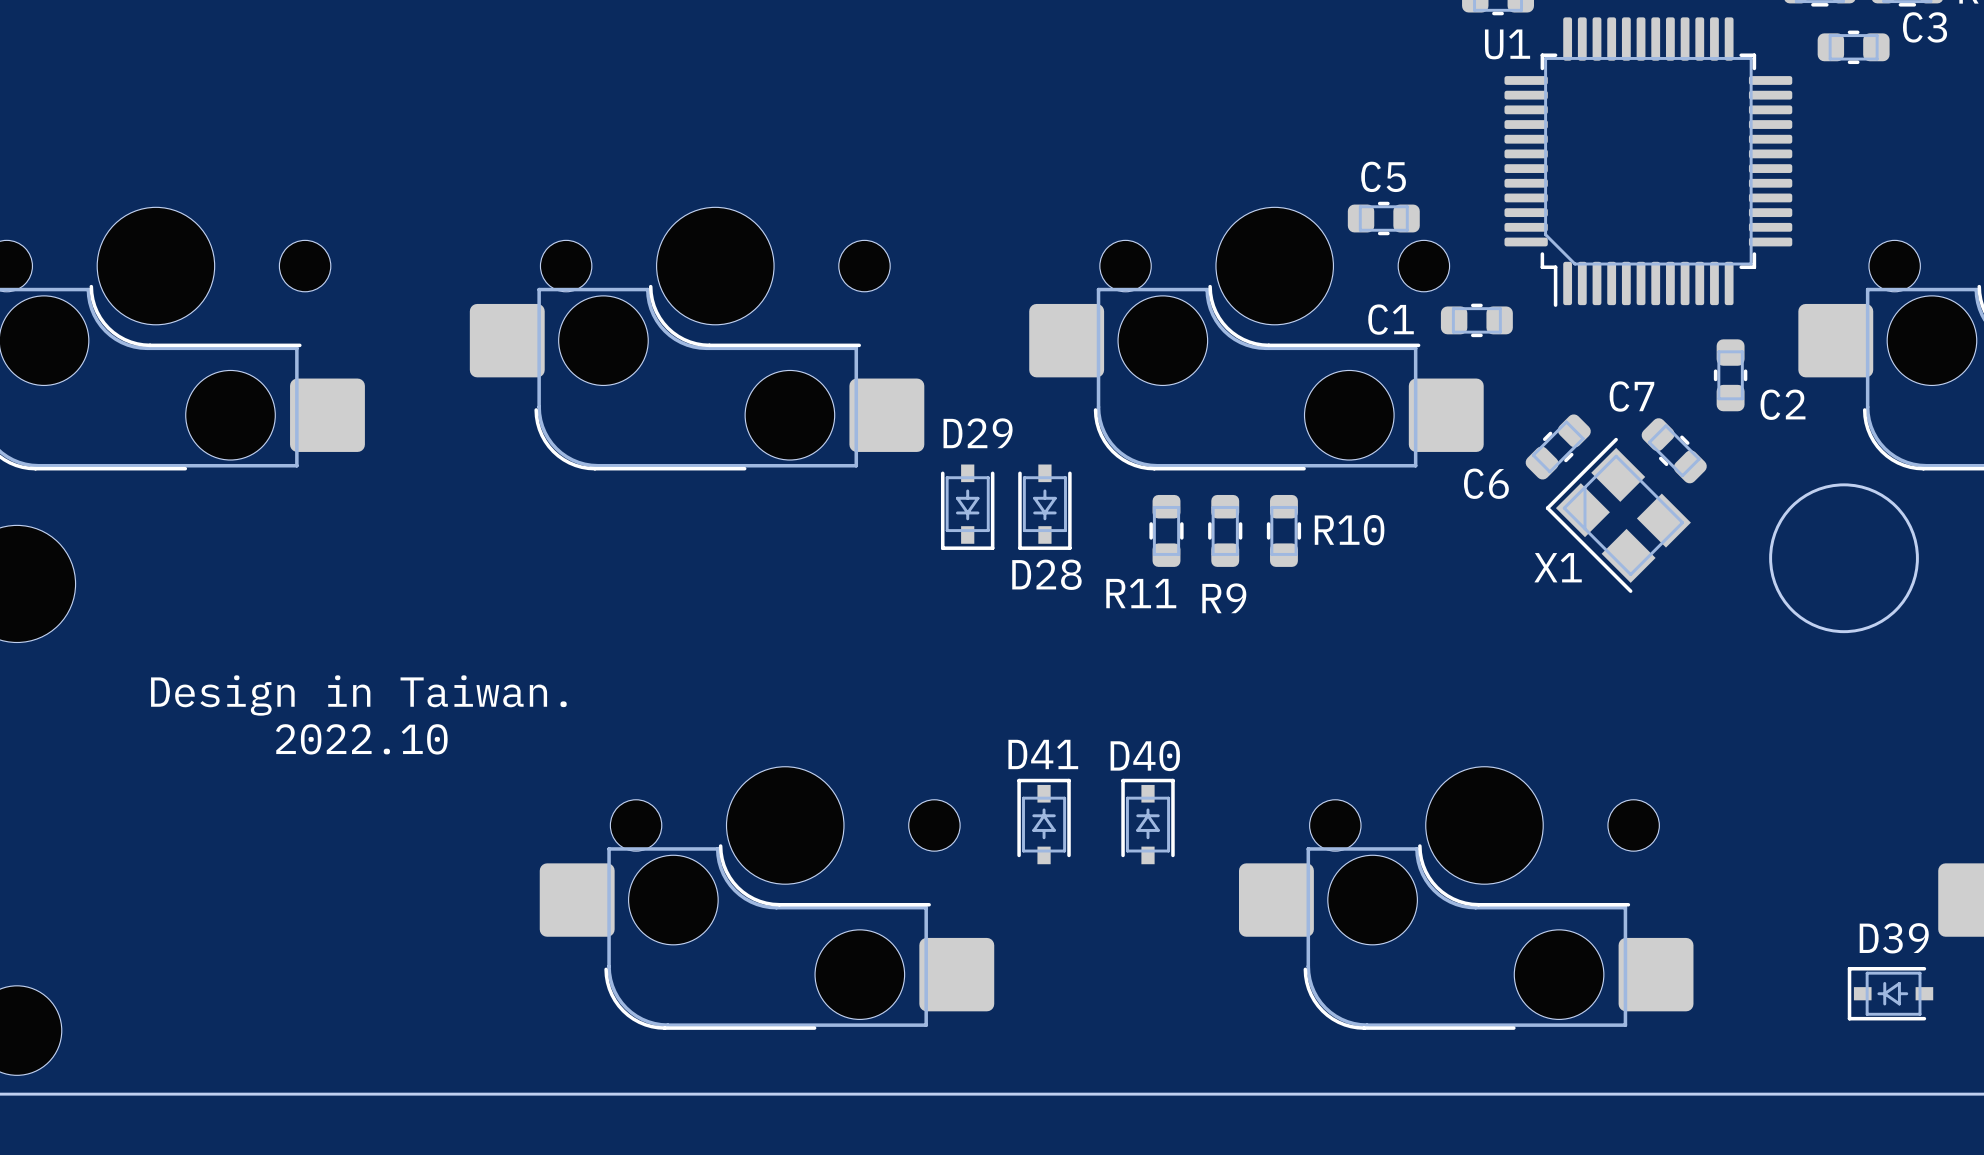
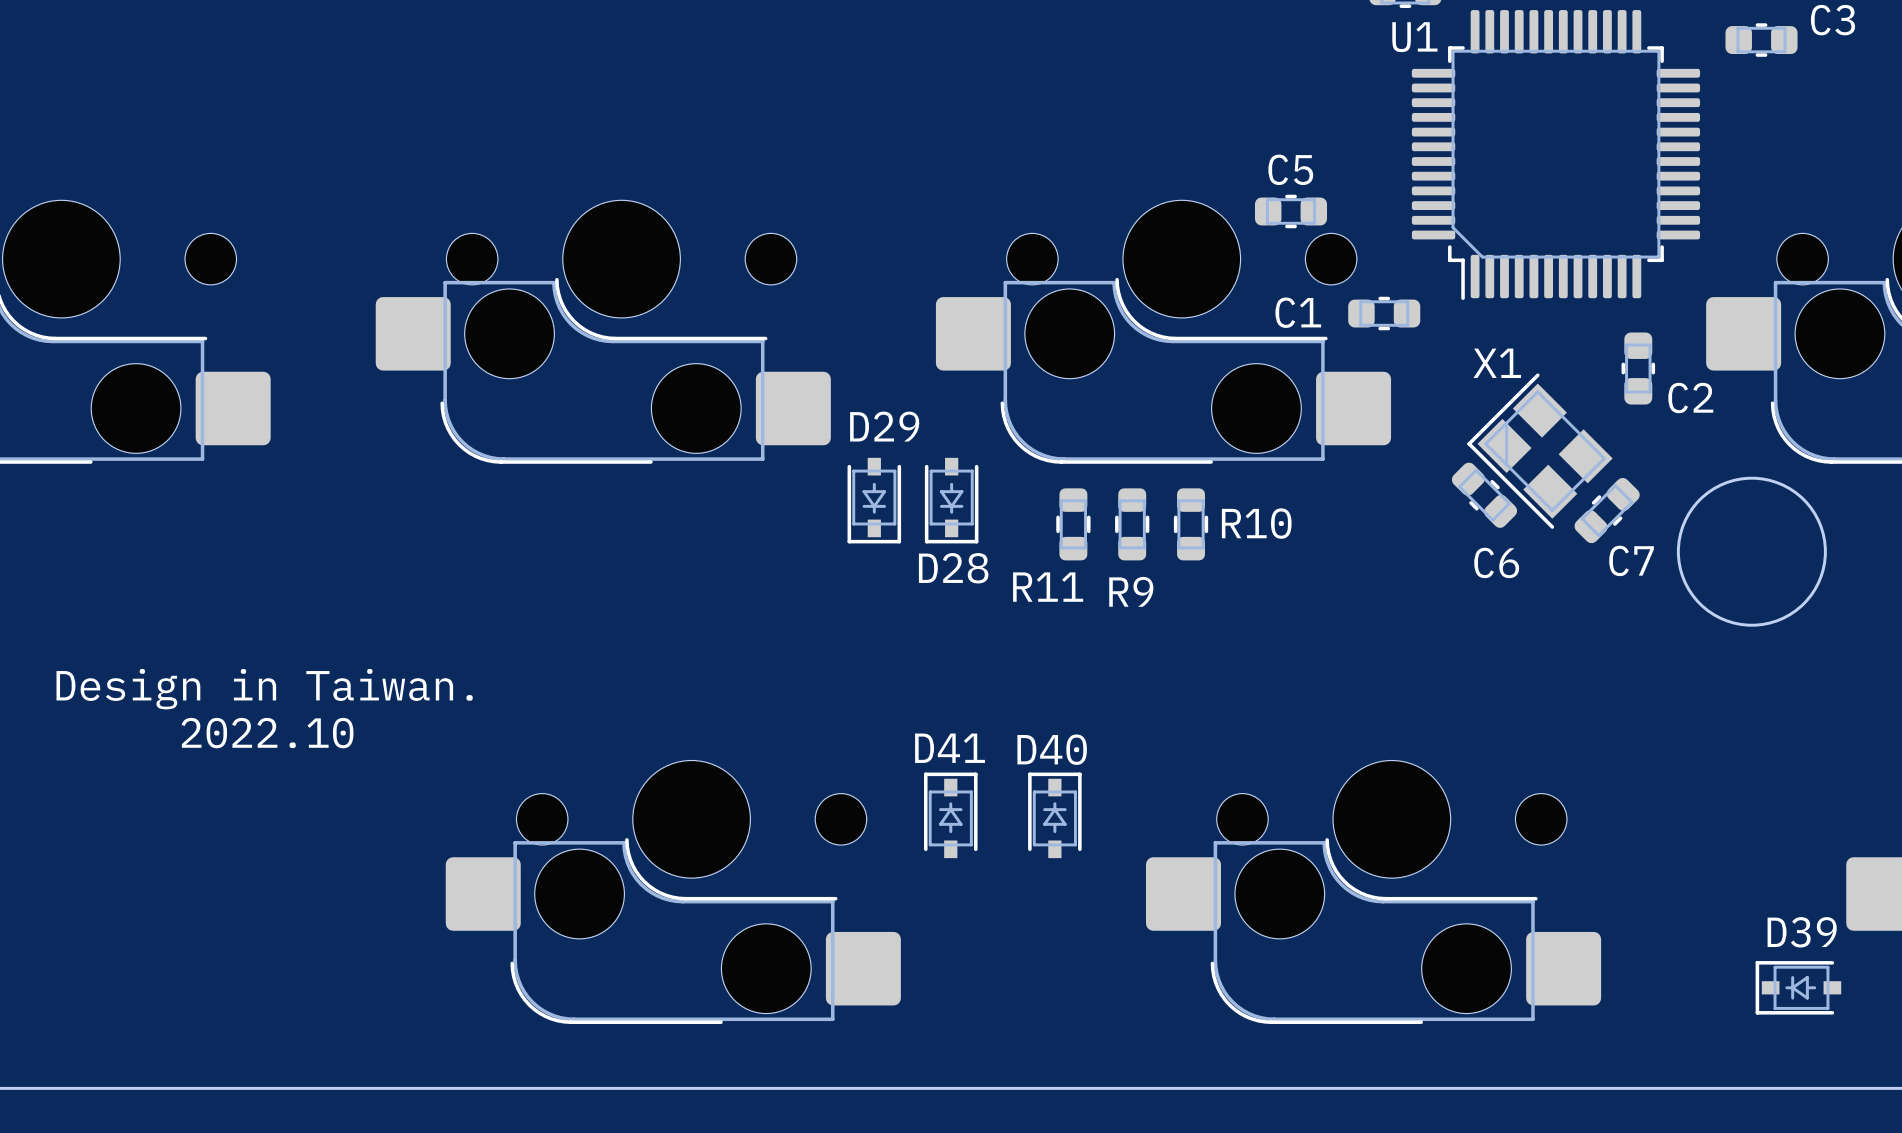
C7 name position: C7 (1631, 396) -> C7 (1631, 560)
C6 rotation: 0° (1558, 446) -> 90° clockwise (1484, 495)
C6 position: (1558, 446) -> (1484, 495)
C7 rotation: 0° (1674, 450) -> 90° clockwise (1607, 510)
C7 position: (1674, 450) -> (1607, 510)
C6 name position: C6 (1486, 483) -> C6 (1496, 562)
X1 position: (1618, 515) -> (1540, 451)
X1 name position: X1 (1558, 567) -> X1 (1497, 363)

